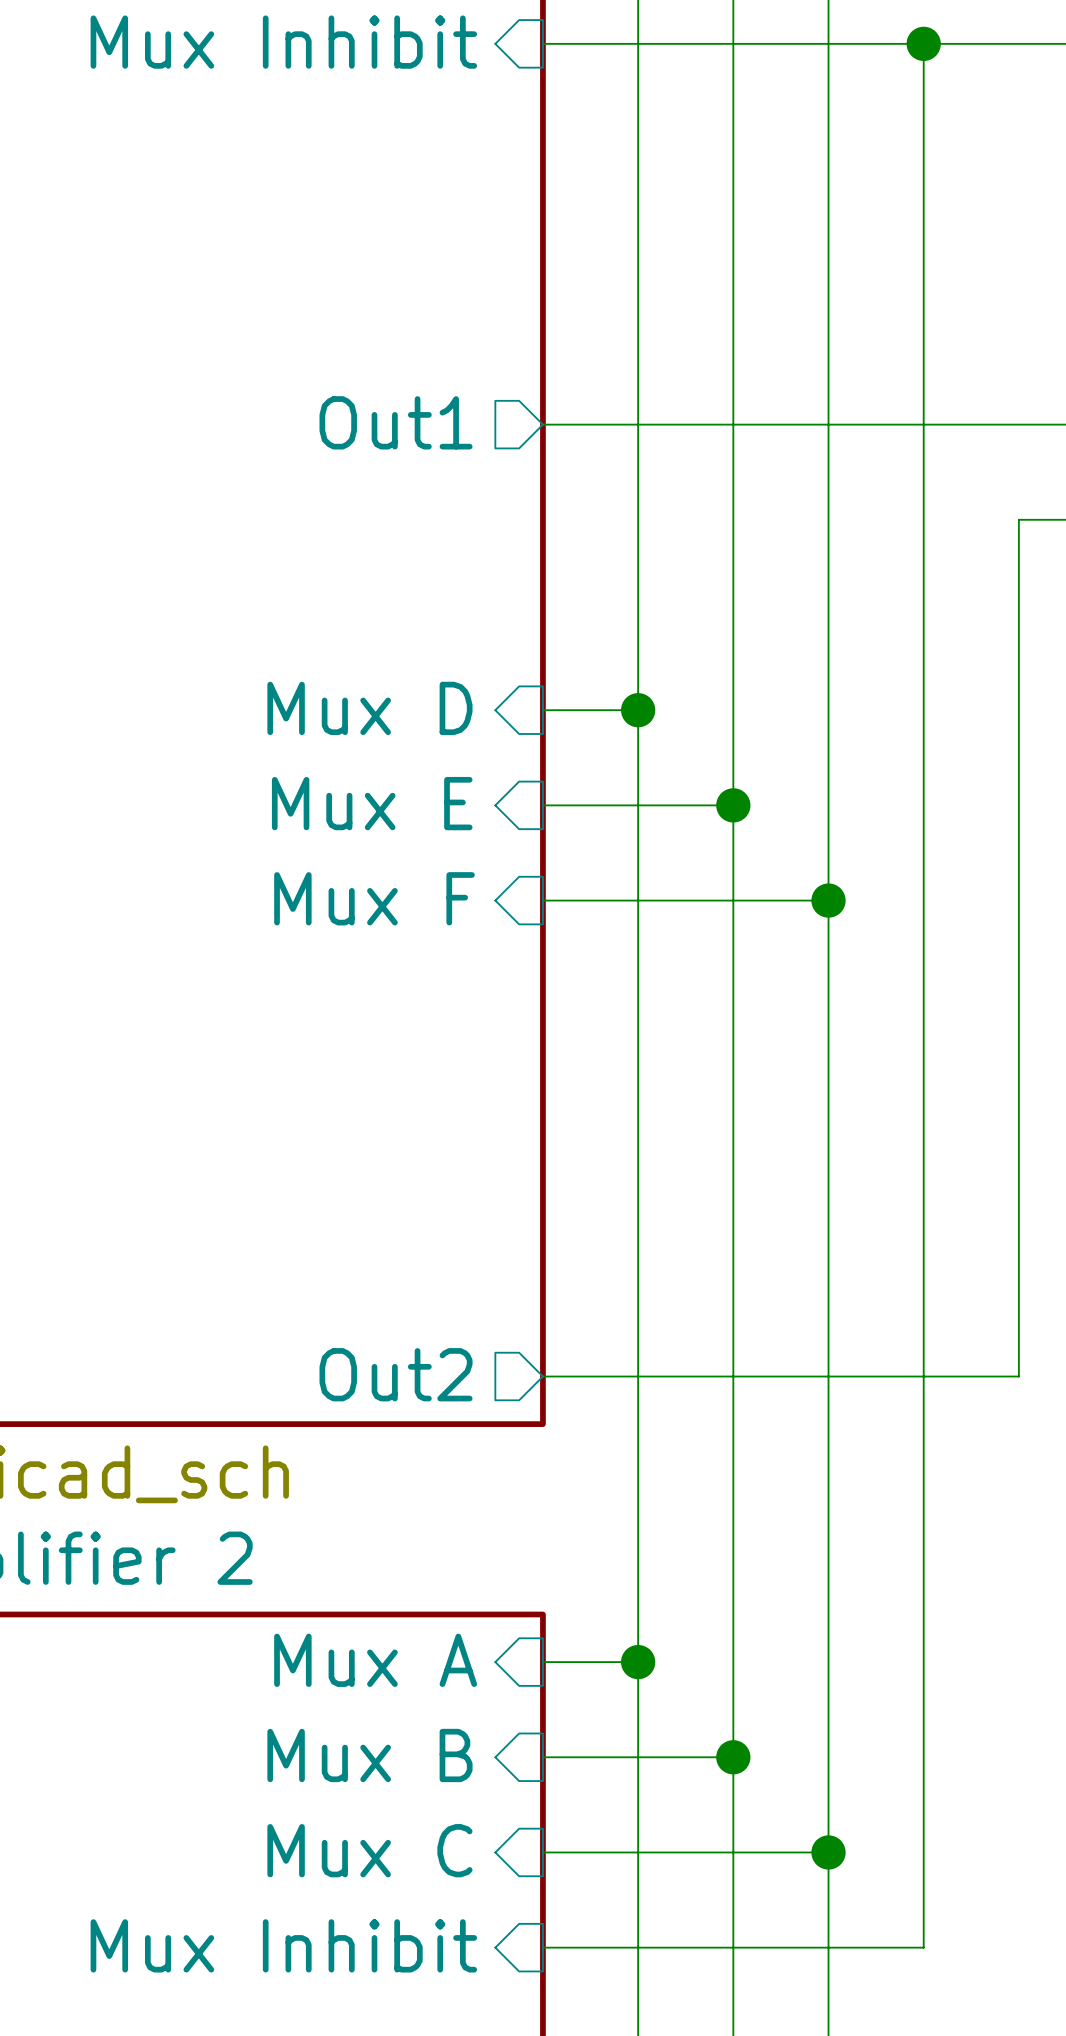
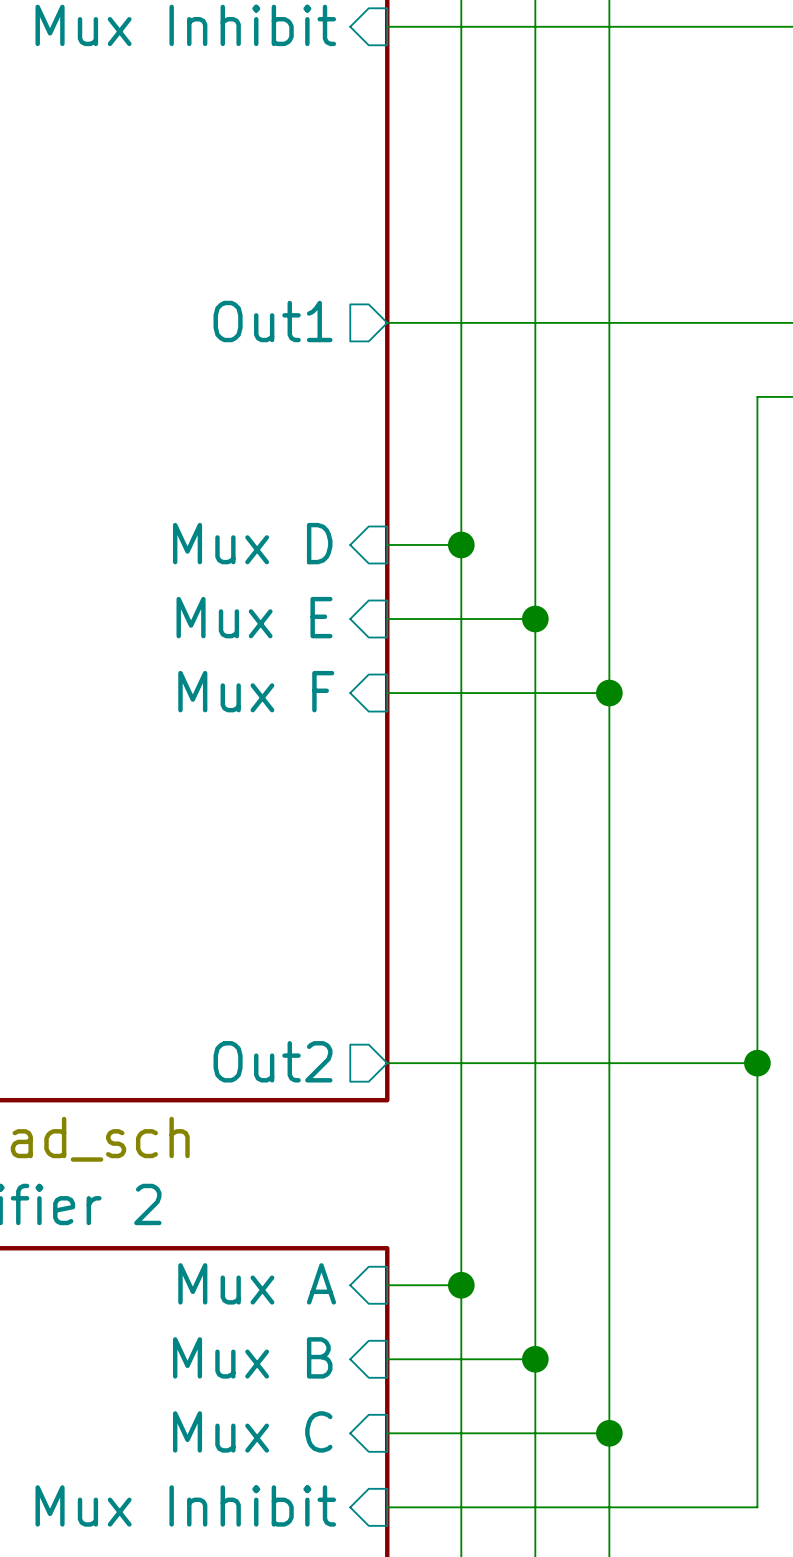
wire: (923, 43) (923, 1947) -> (757, 1063) (757, 1507) (683, 1507)
junction: (923, 43) -> none
junction: none -> (757, 1063)

